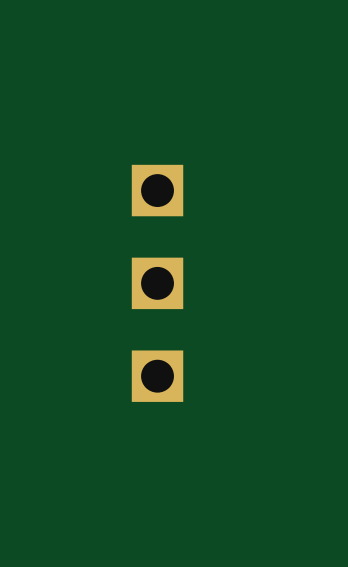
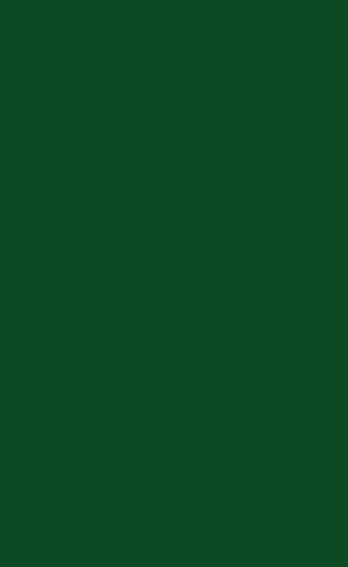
part: (157, 283) -> none

